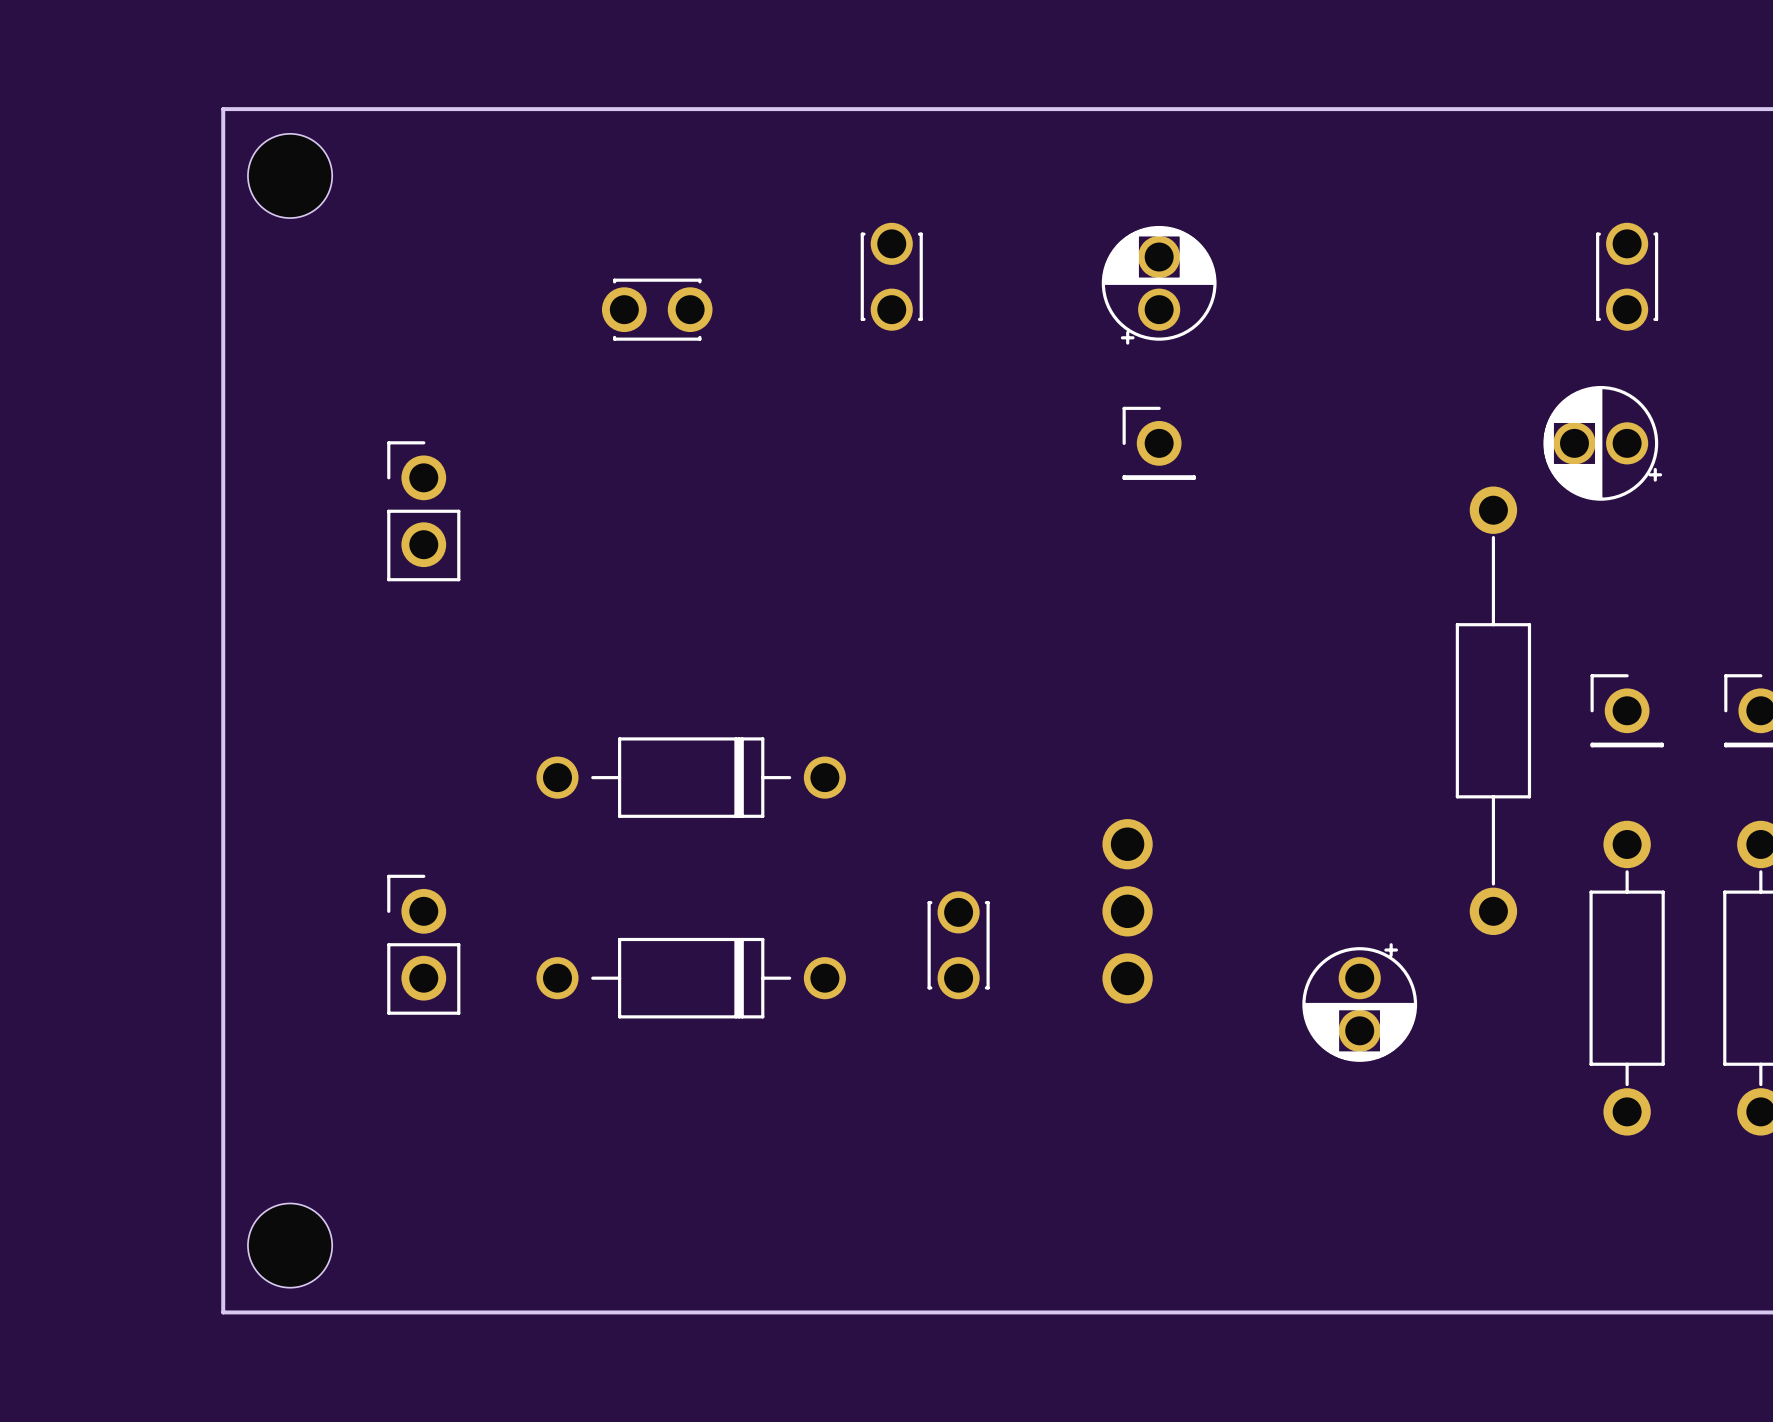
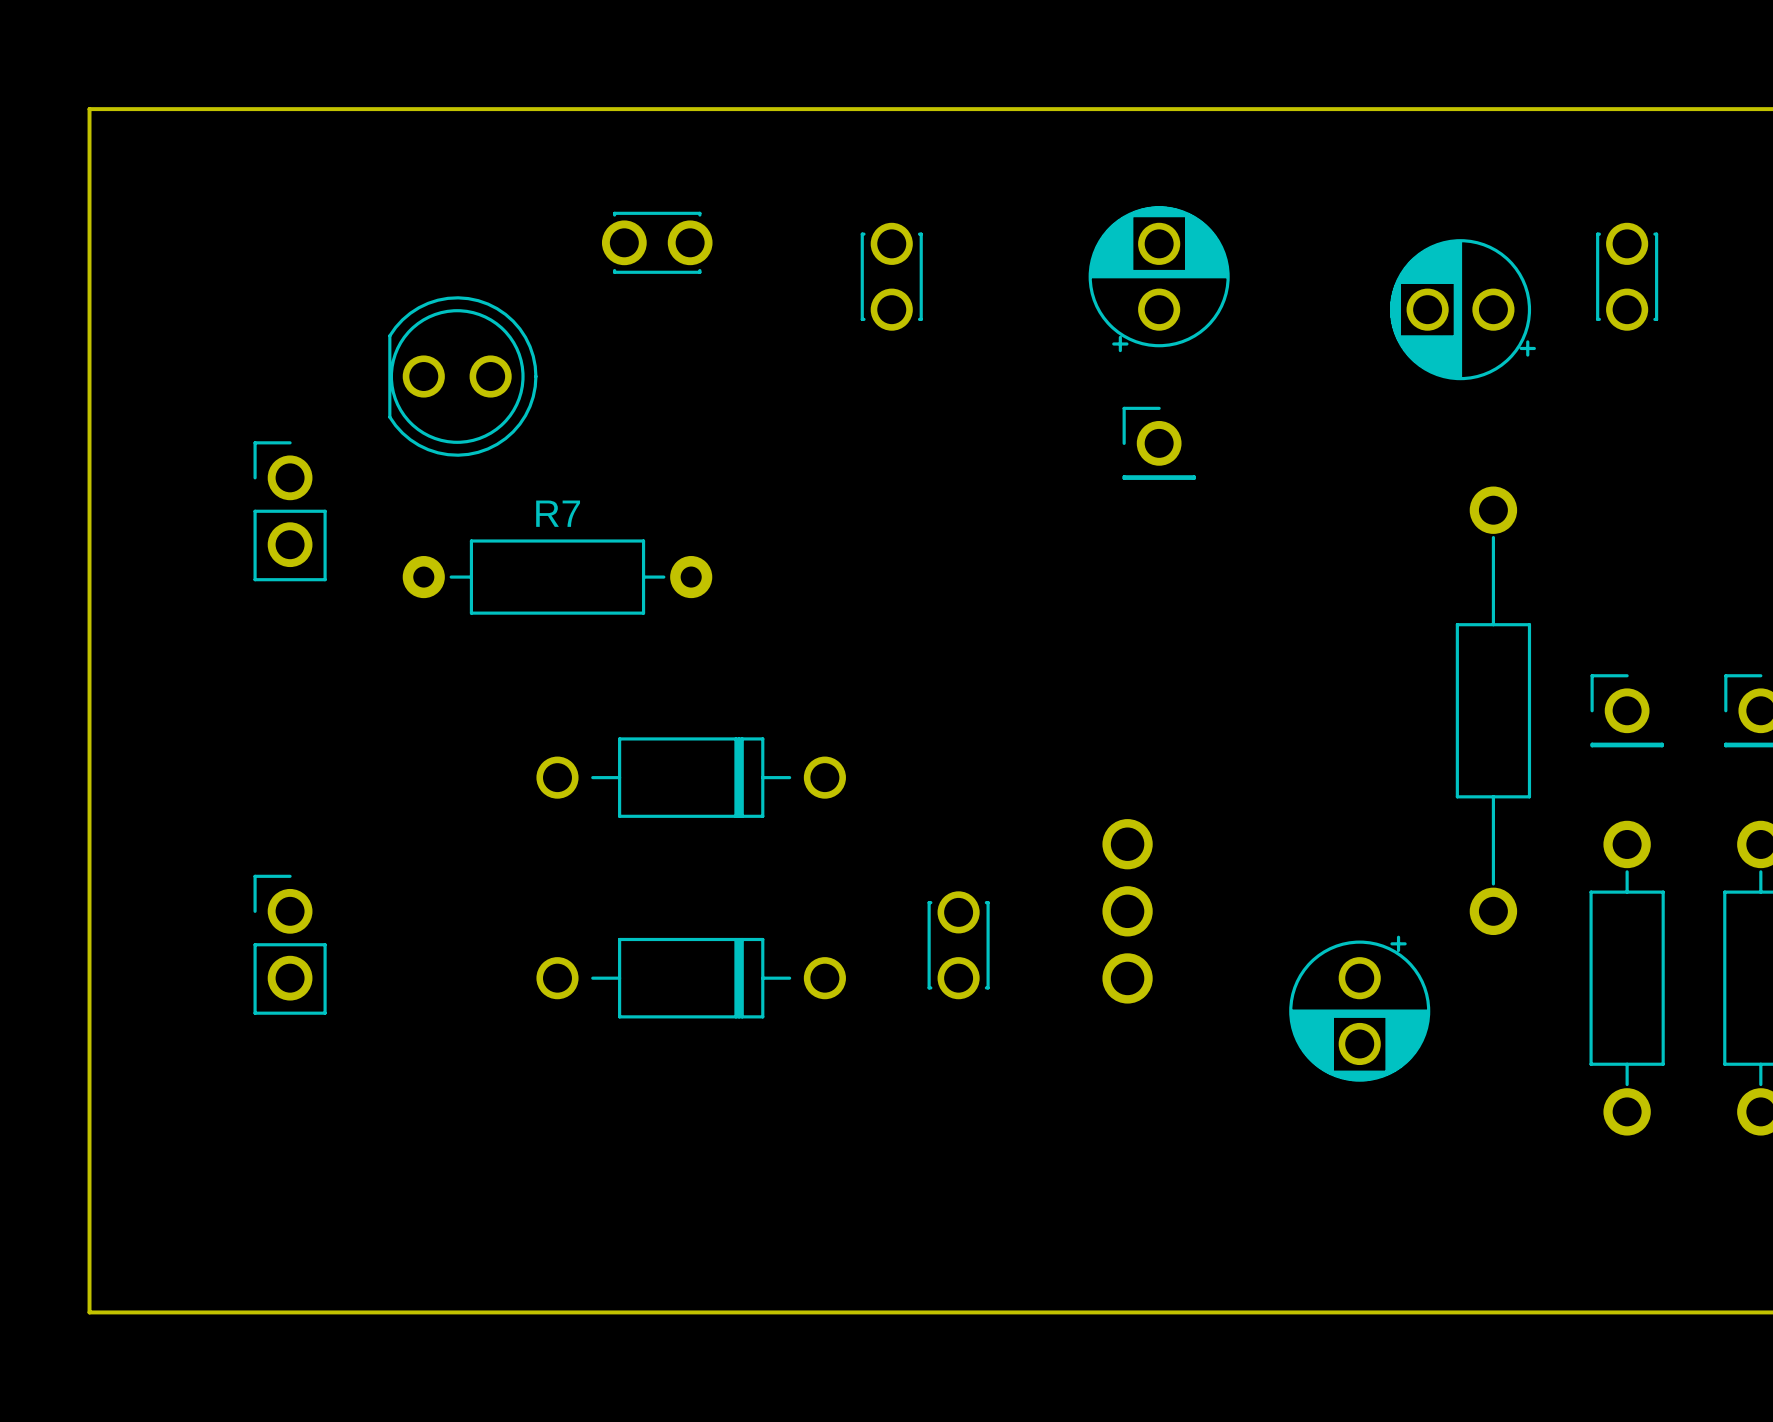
board edge: (223, 109) (223, 1312) -> (223, 109) (89, 109) (89, 1312) (223, 1312)
part: (290, 175) -> none
part footprint: [1101, 225, 1217, 345] -> [1088, 206, 1230, 353]
part position: (657, 309) -> (657, 242)
part: none -> (1462, 309)
part: none -> (462, 376)
part: (1602, 443) -> none
part position: (423, 511) -> (290, 511)
R7: none -> (557, 577)
part footprint: [1302, 943, 1418, 1062] -> [1289, 935, 1431, 1082]
part position: (423, 944) -> (290, 944)
part: (290, 1245) -> none

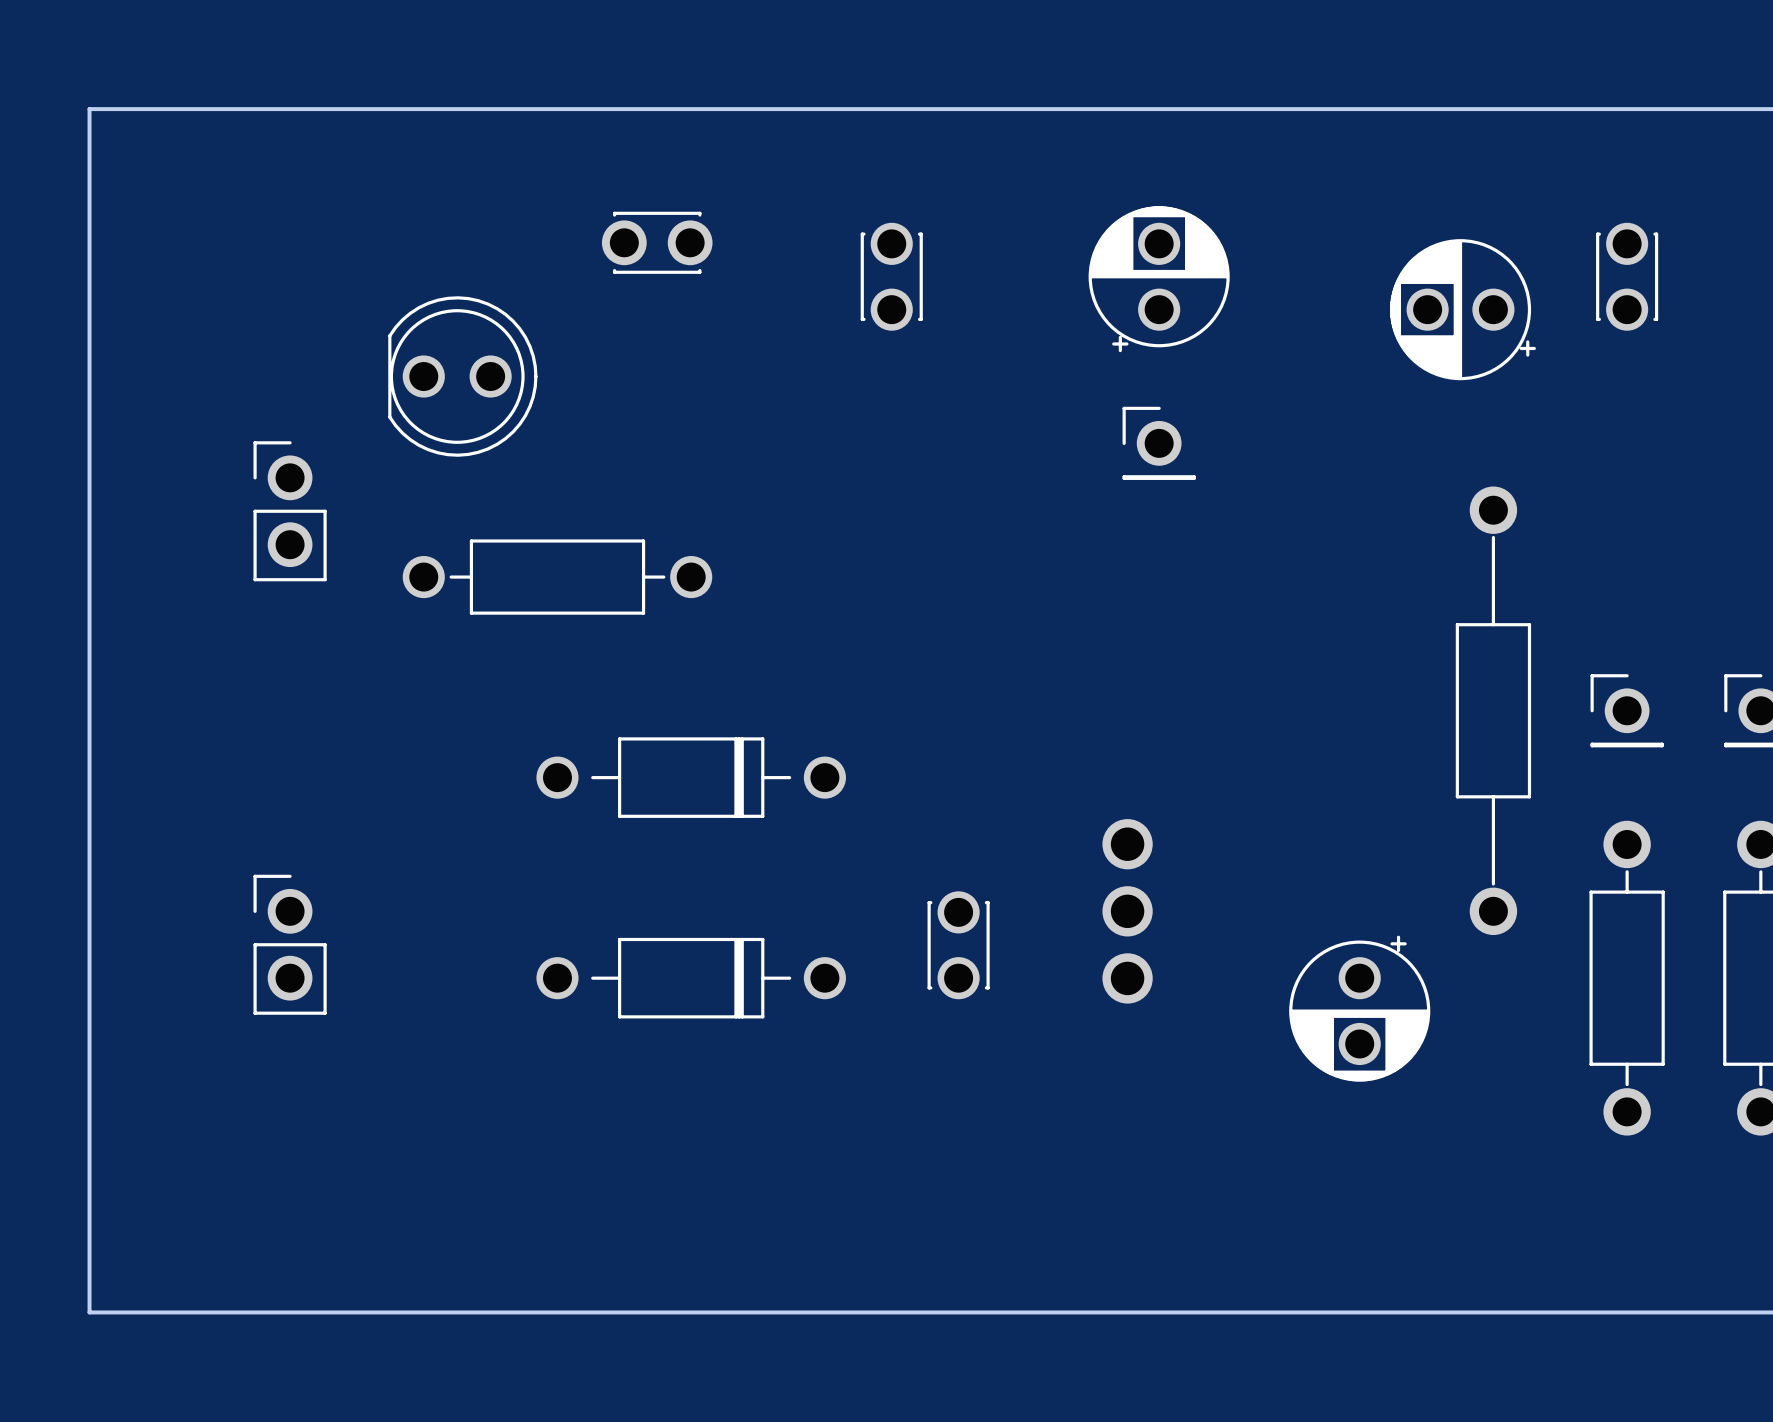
R7: (557, 577) -> none
part: none -> (557, 577)

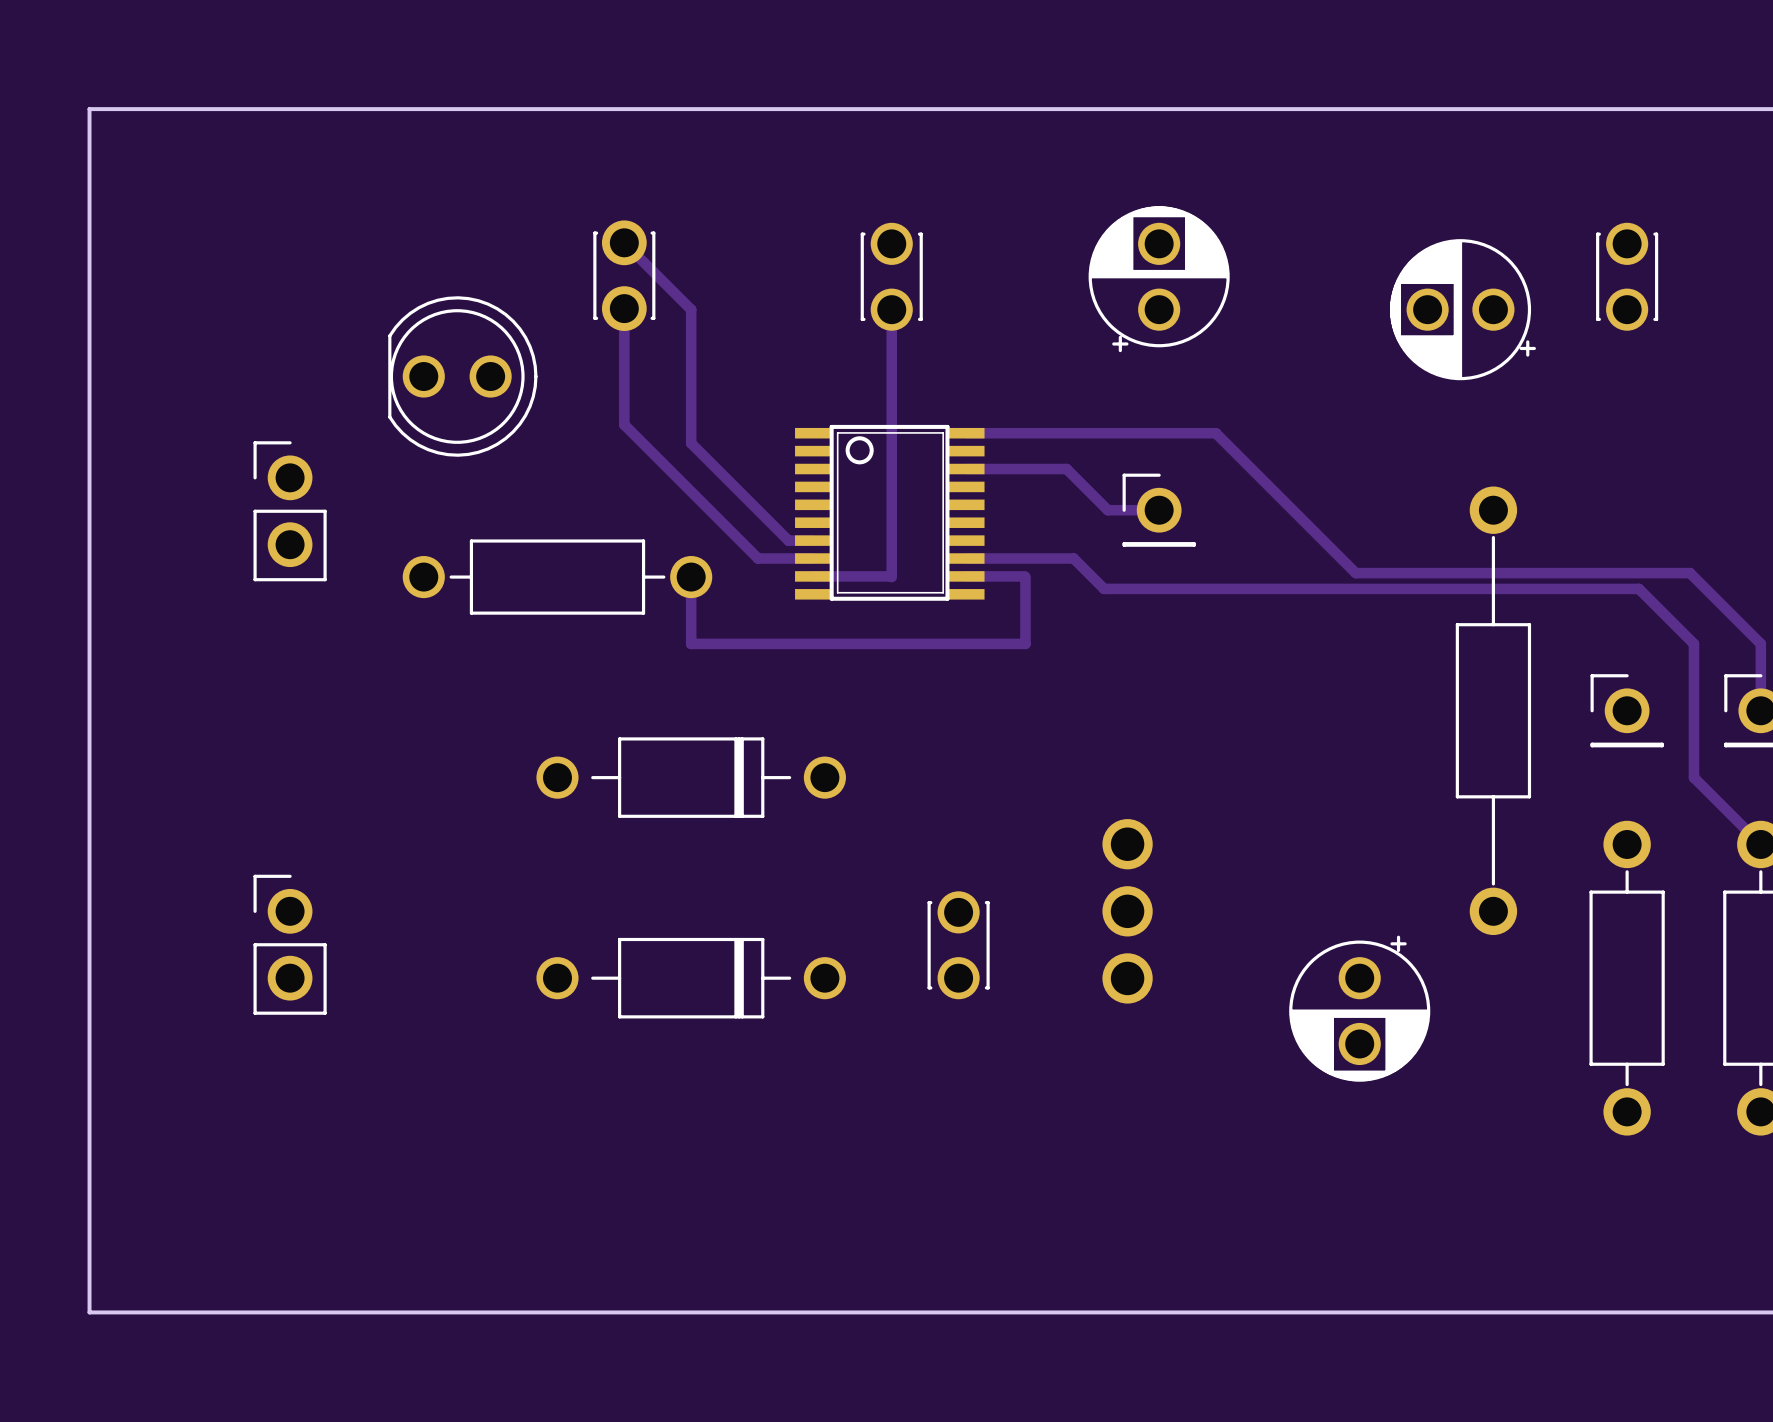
track: none -> (624, 242) (691, 309) (691, 443) (788, 540) (812, 540)
part rotation: 0° (657, 242) -> 90° clockwise (624, 275)
track: none -> (624, 308) (624, 424) (758, 558) (812, 558)
track: none -> (891, 308) (891, 577) (812, 576)
track: none -> (966, 433) (1215, 433) (1355, 573) (1690, 573) (1760, 643) (1760, 710)
part position: (1159, 443) -> (1159, 510)
track: none -> (966, 469) (1066, 469) (1107, 510) (1159, 510)
part: none -> (889, 512)
track: none -> (966, 558) (1073, 558) (1104, 588) (1638, 588) (1693, 643) (1693, 777) (1760, 844)
track: none -> (966, 576) (1025, 577) (1025, 643) (691, 643) (691, 577)

